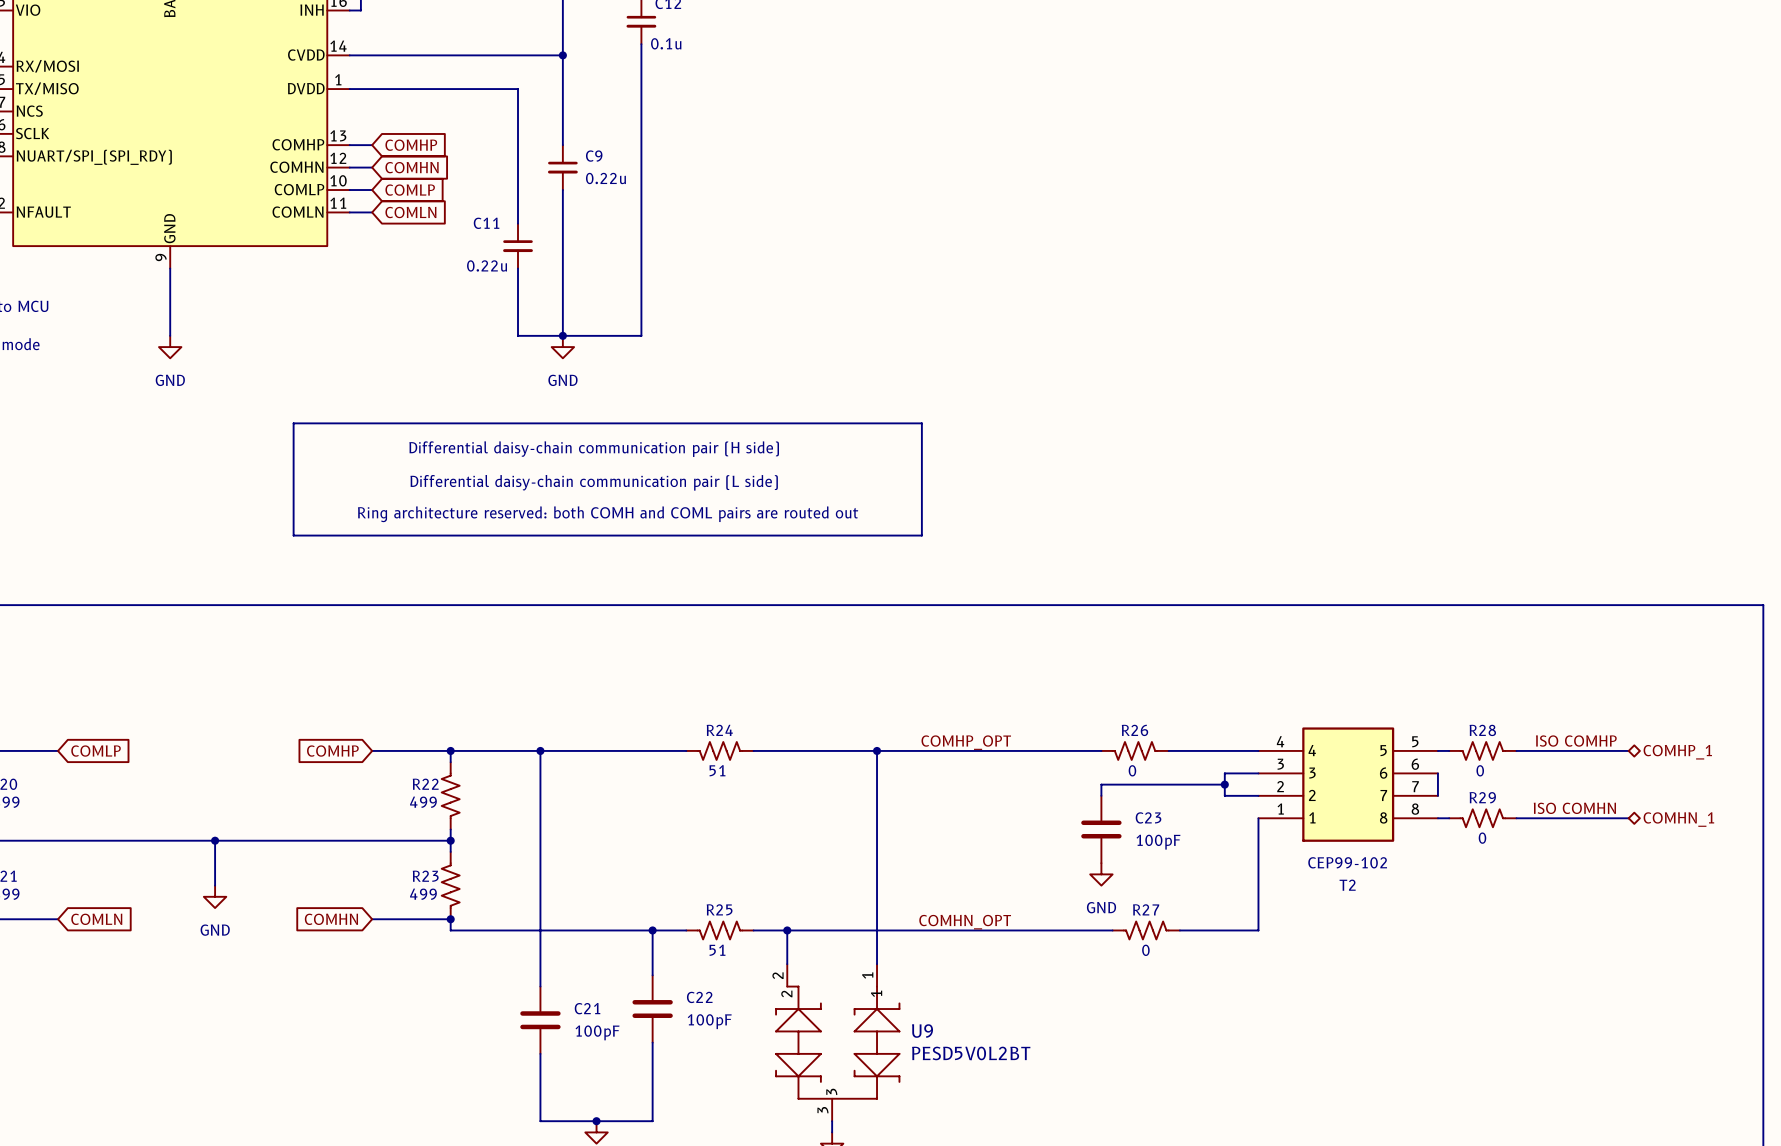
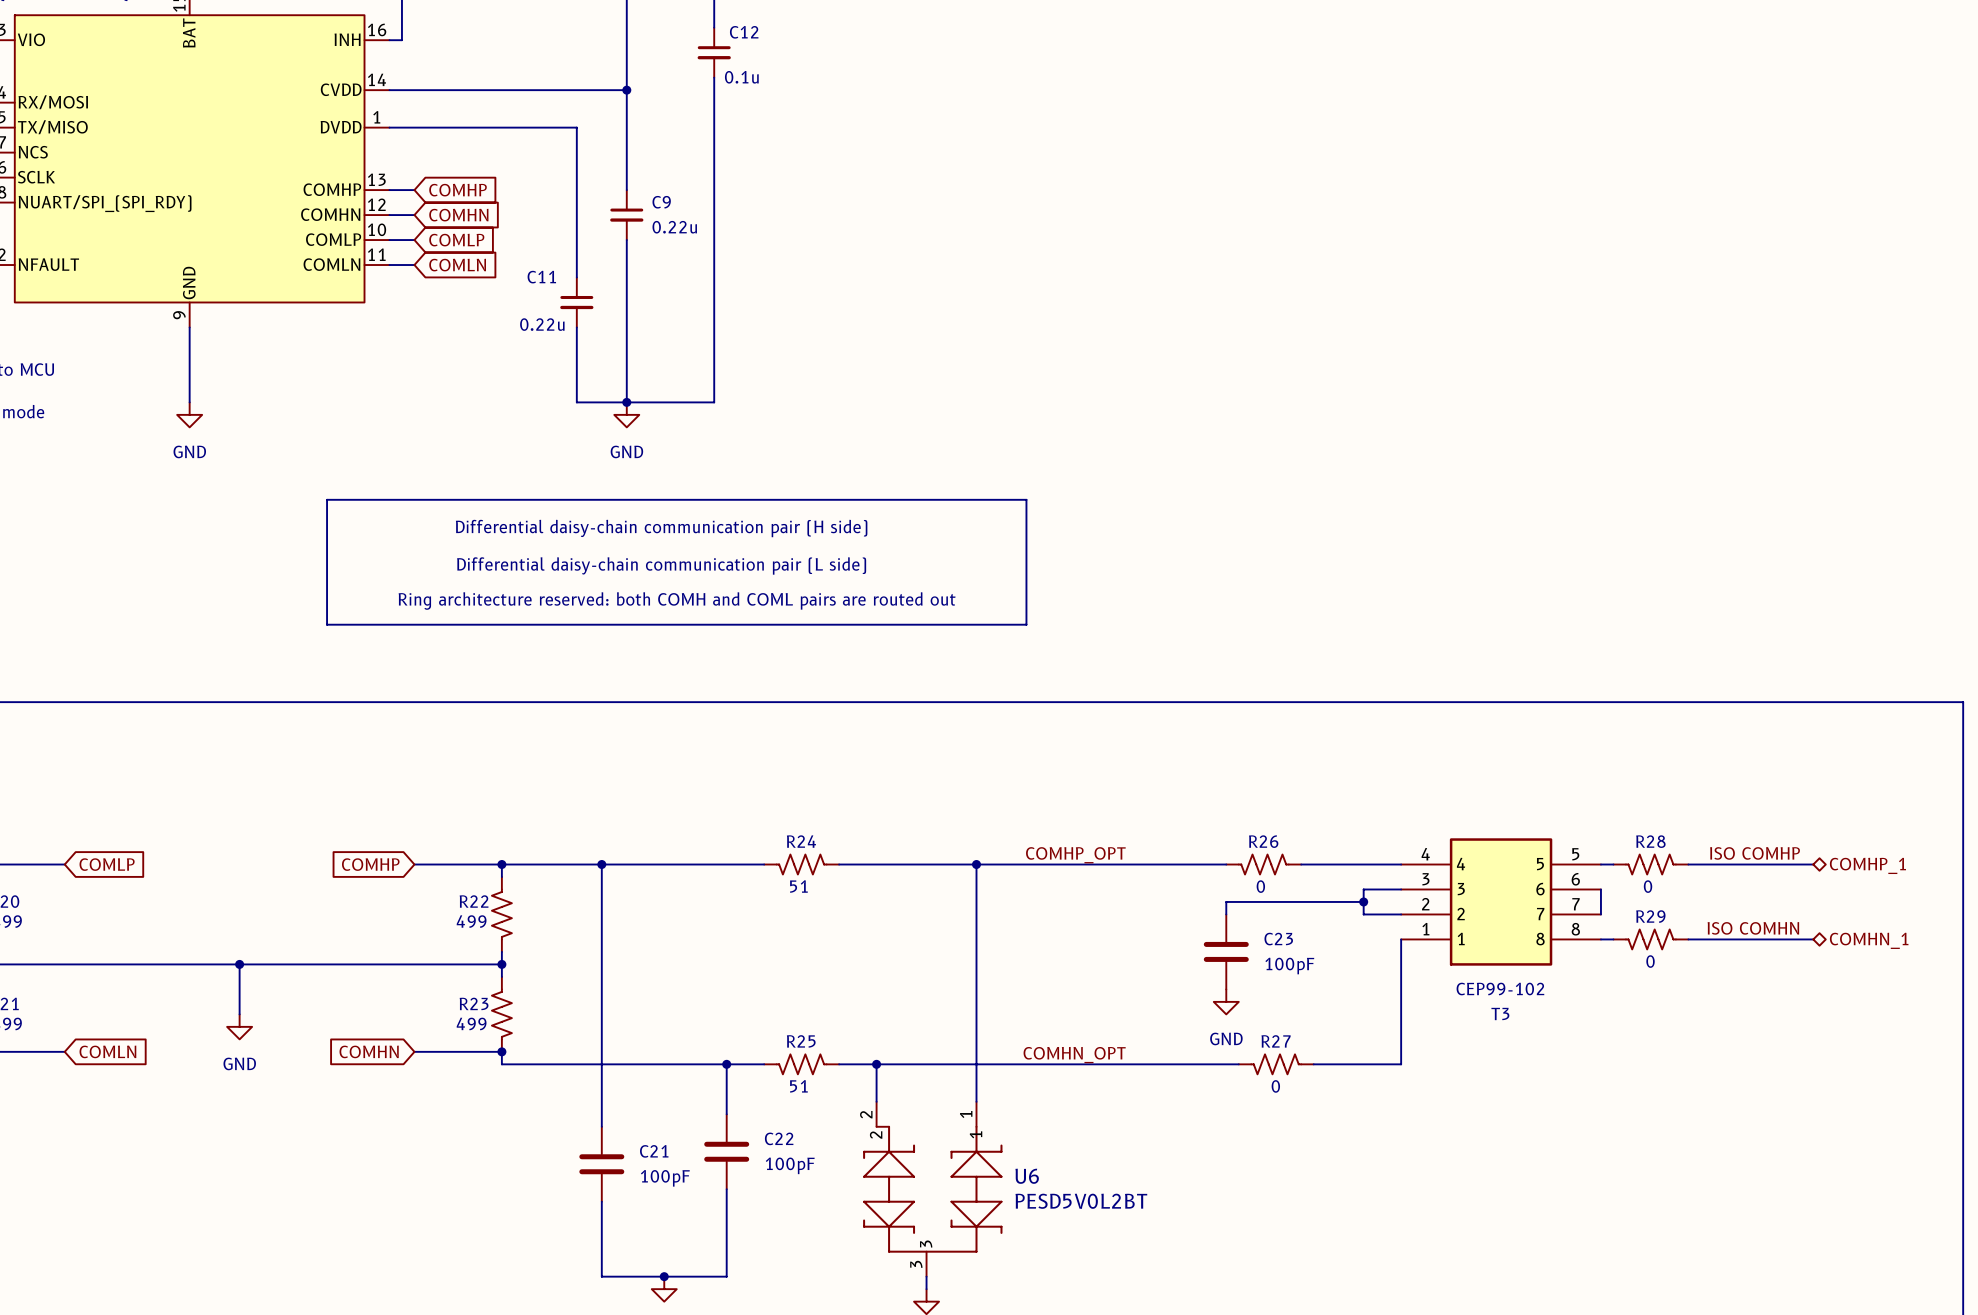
T2 name: T2 (1347, 885) -> T3 (1500, 1014)
U9 name: U9 (922, 1031) -> U6 (1027, 1176)

